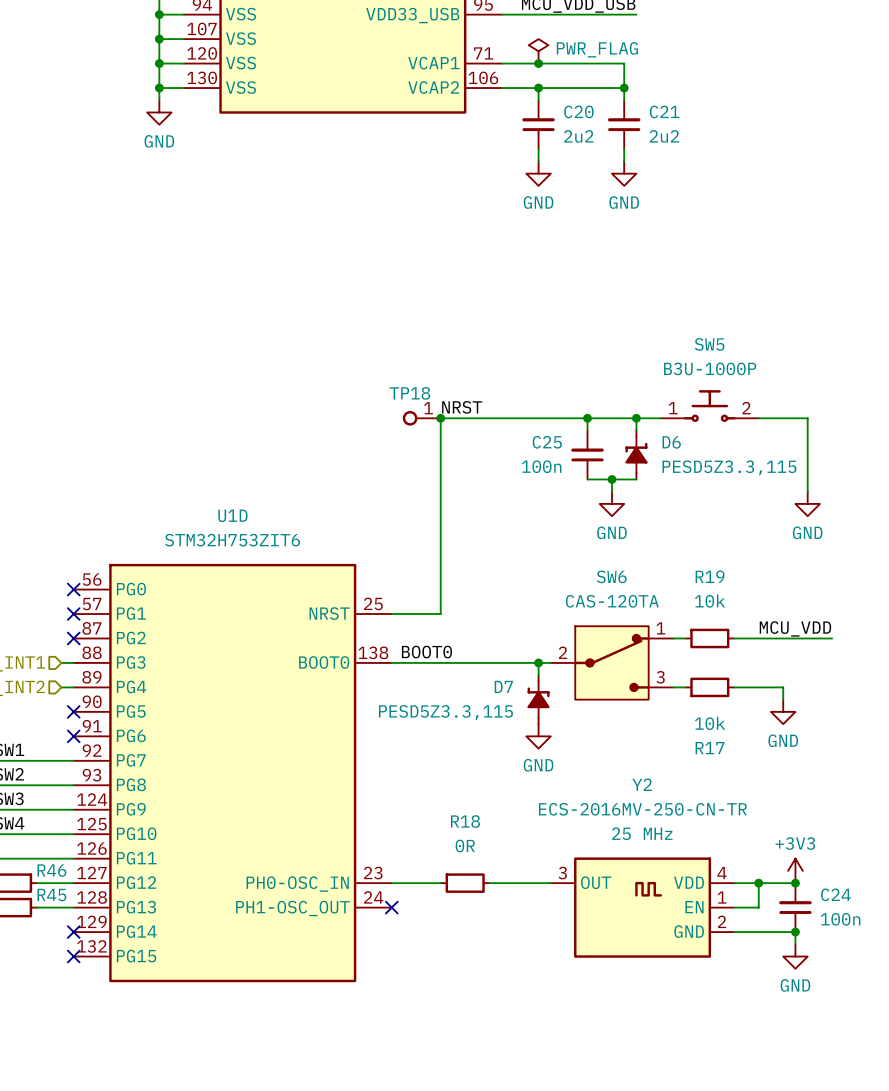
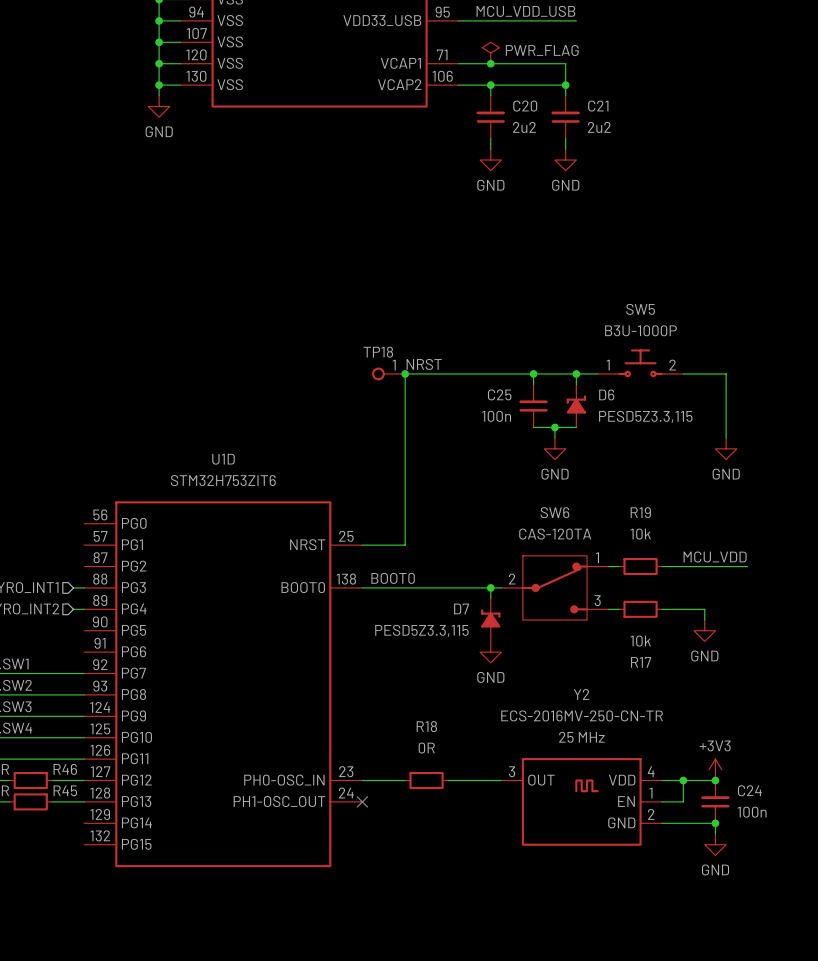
no-connect mark: (73, 589) -> none
no-connect mark: (73, 614) -> none
no-connect mark: (73, 638) -> none
no-connect mark: (73, 711) -> none
no-connect mark: (73, 736) -> none
no-connect mark: (73, 932) -> none
no-connect mark: (73, 956) -> none

